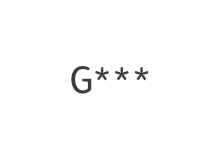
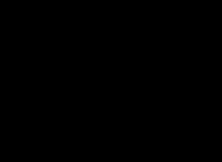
text: G*** (109, 79) -> none

